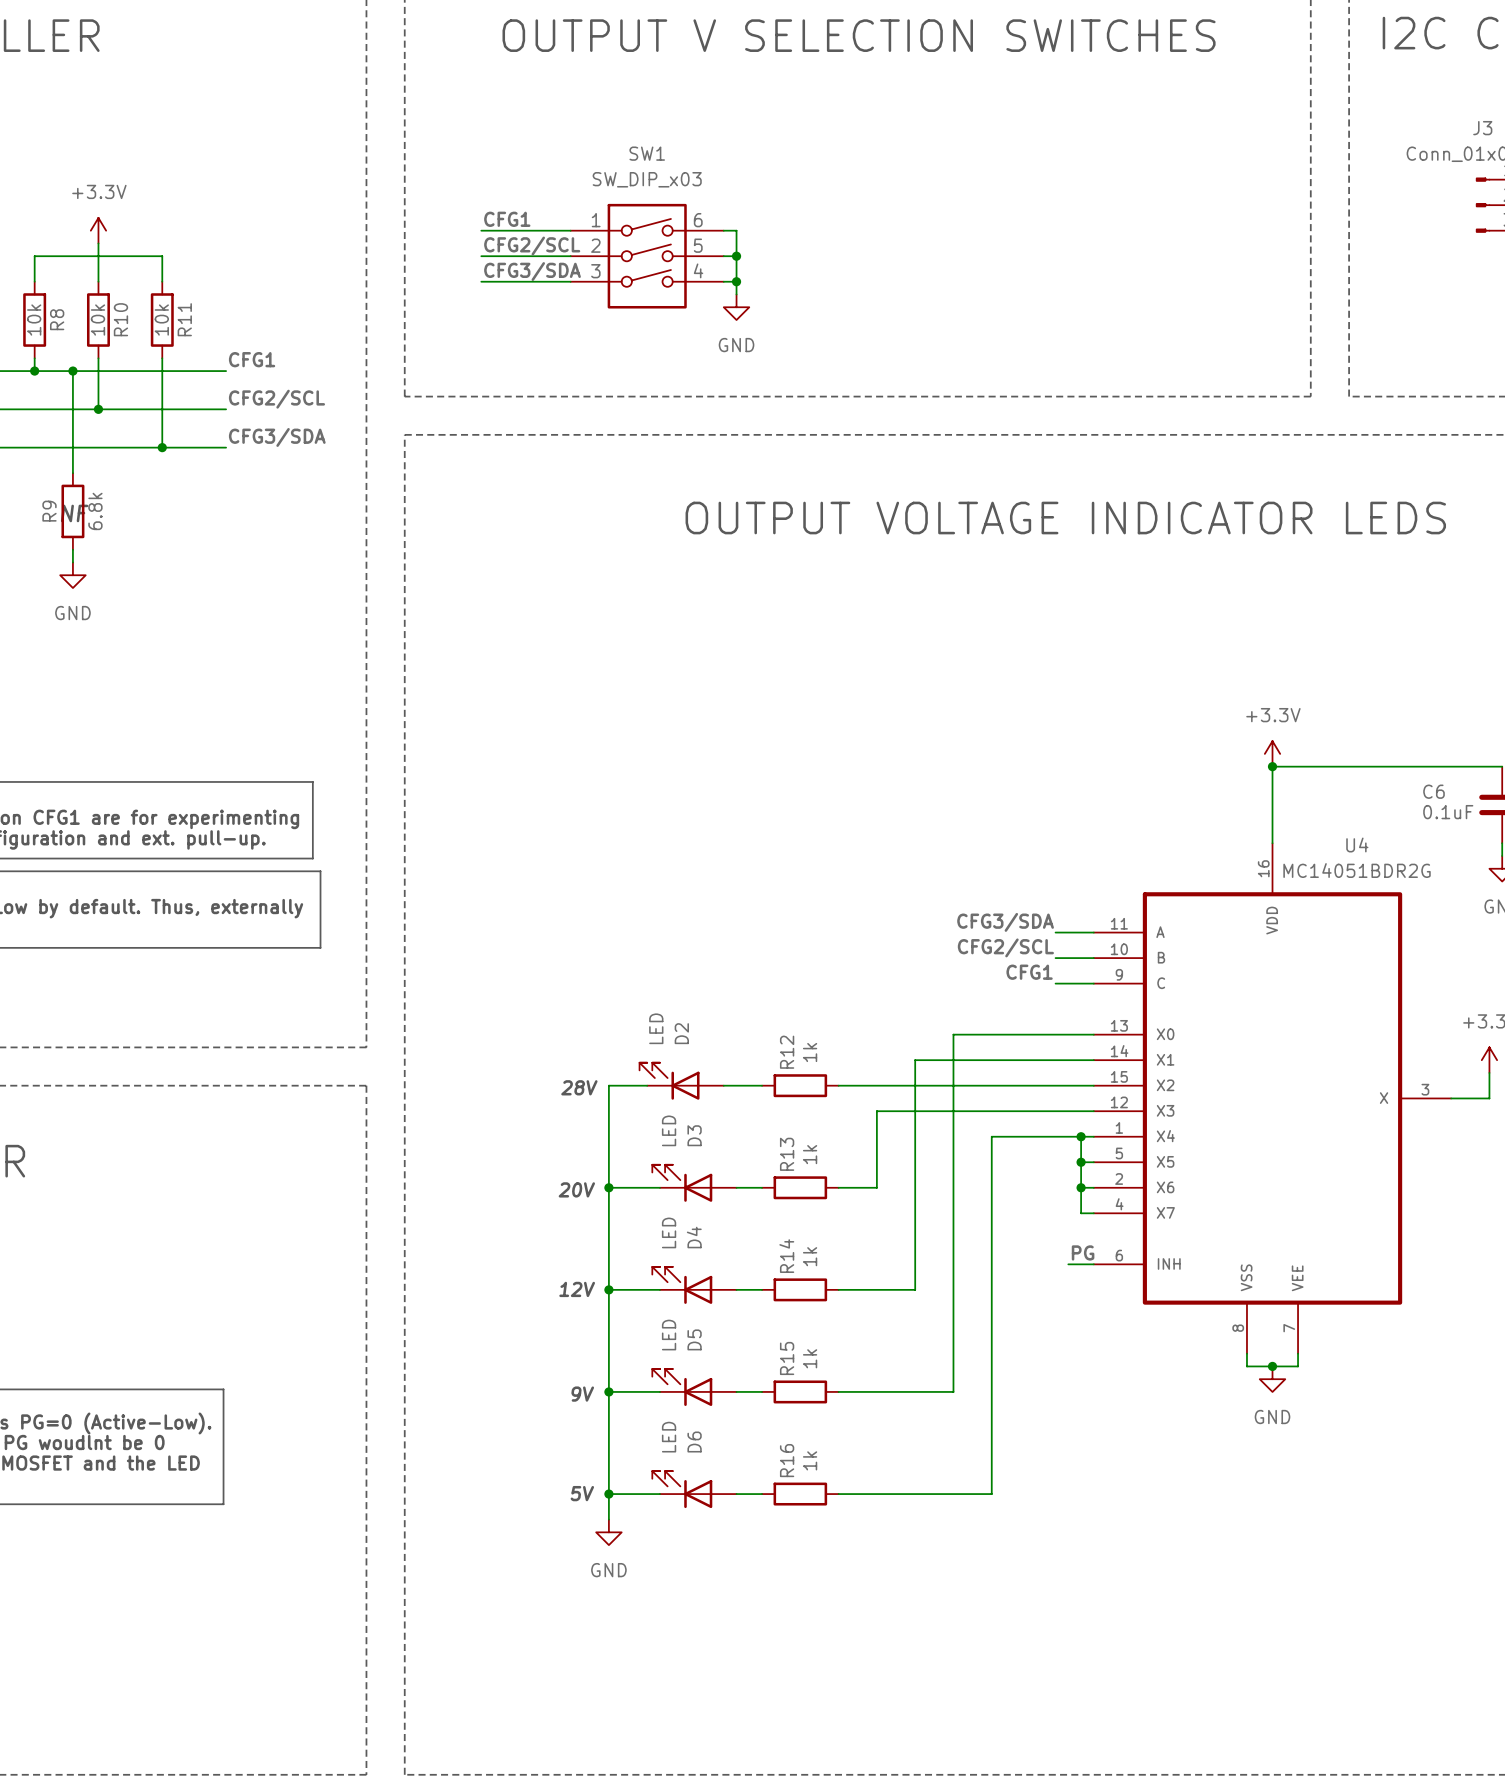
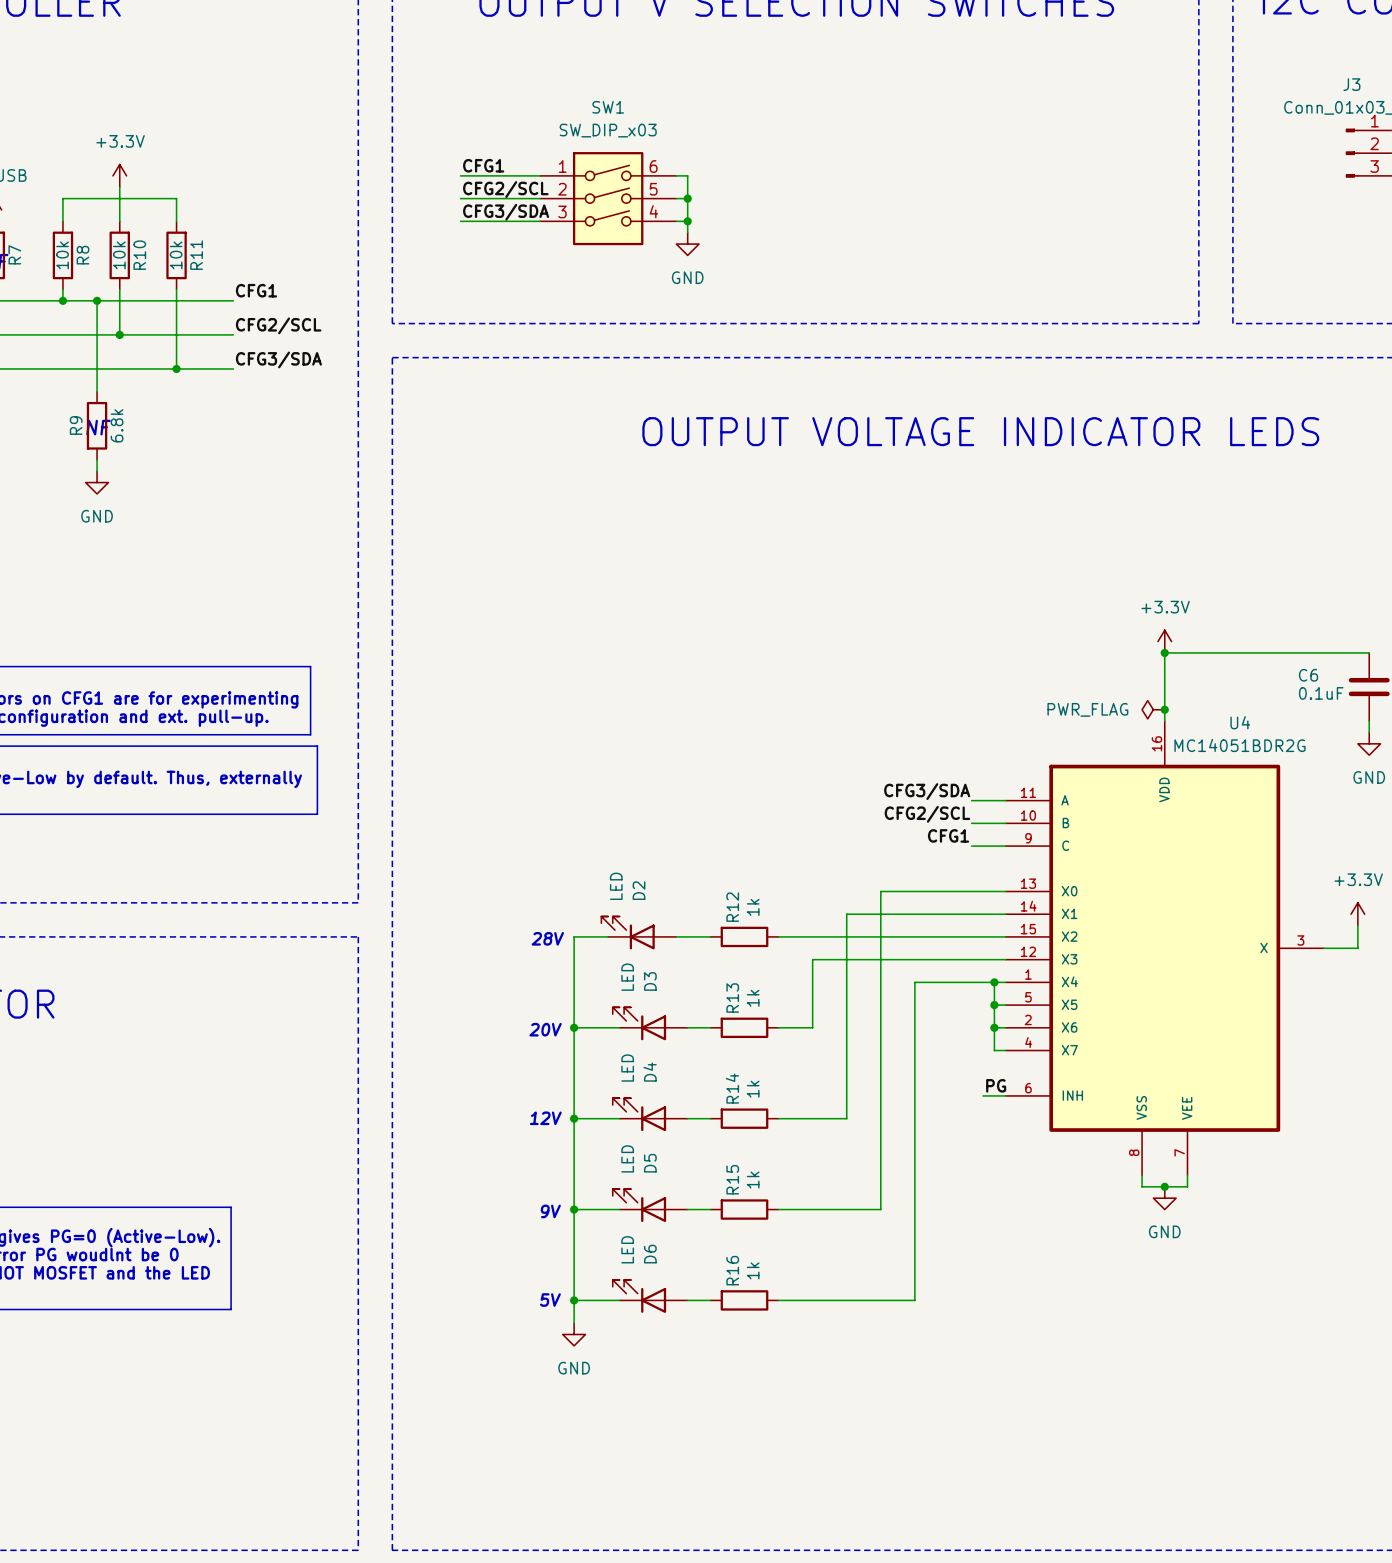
power symbol: none -> PWR_FLAG (1153, 709)
junction: none -> (1164, 709)

